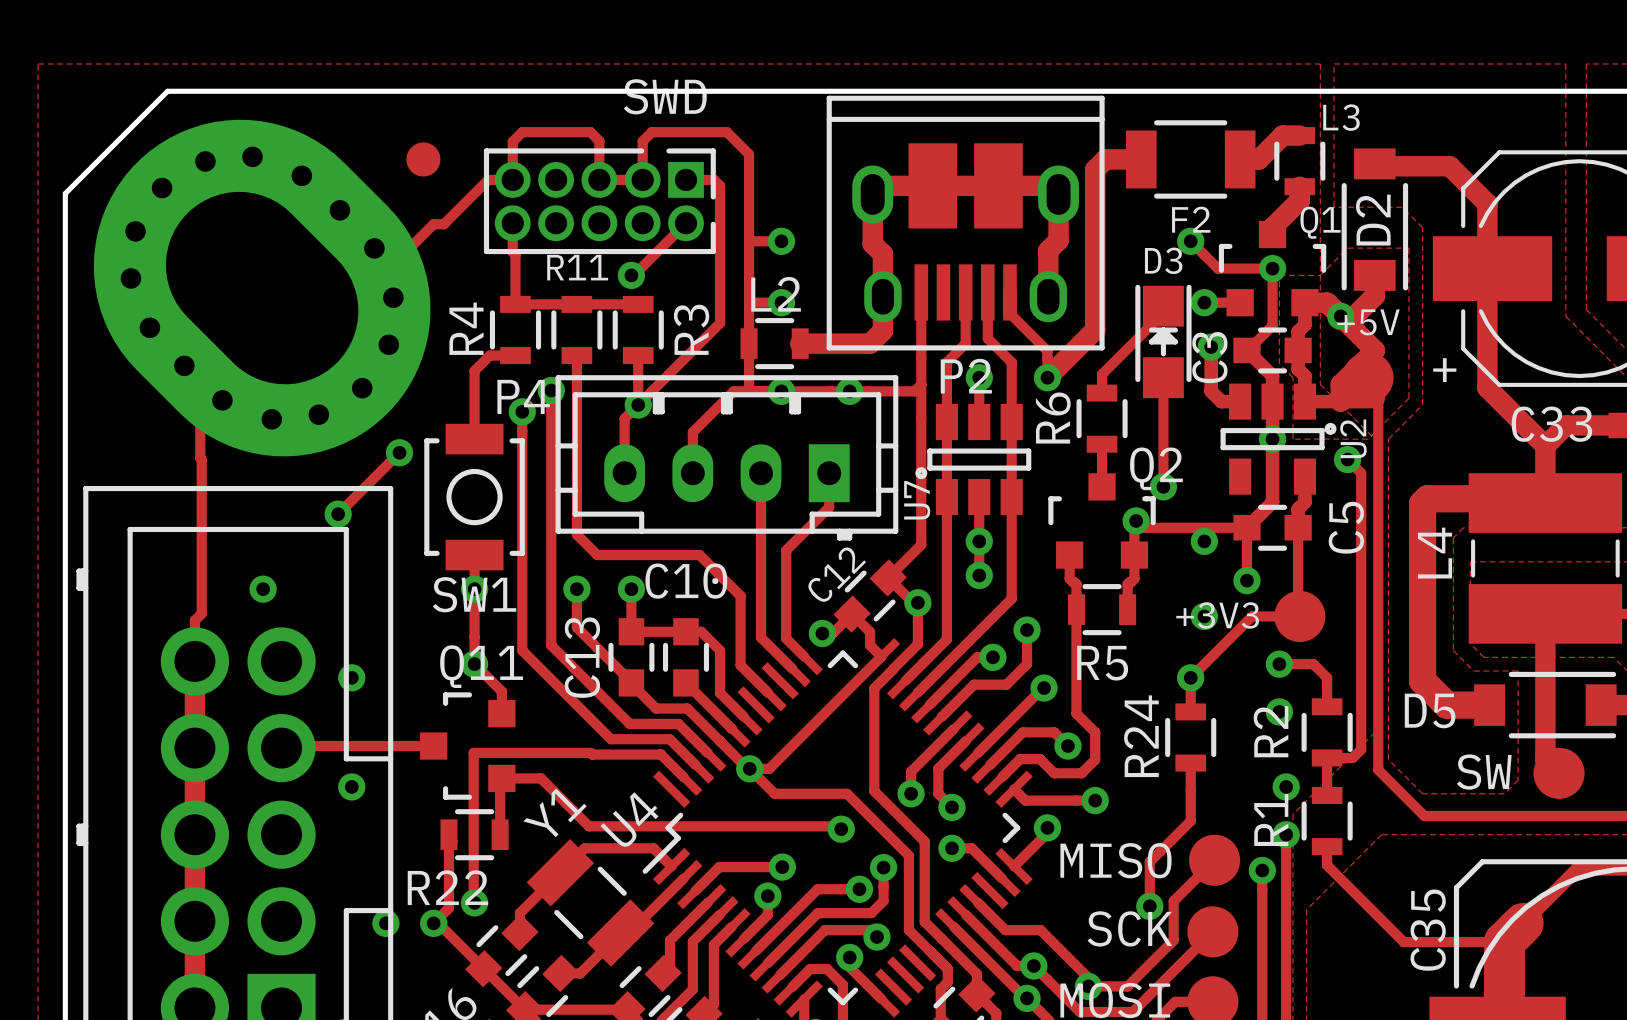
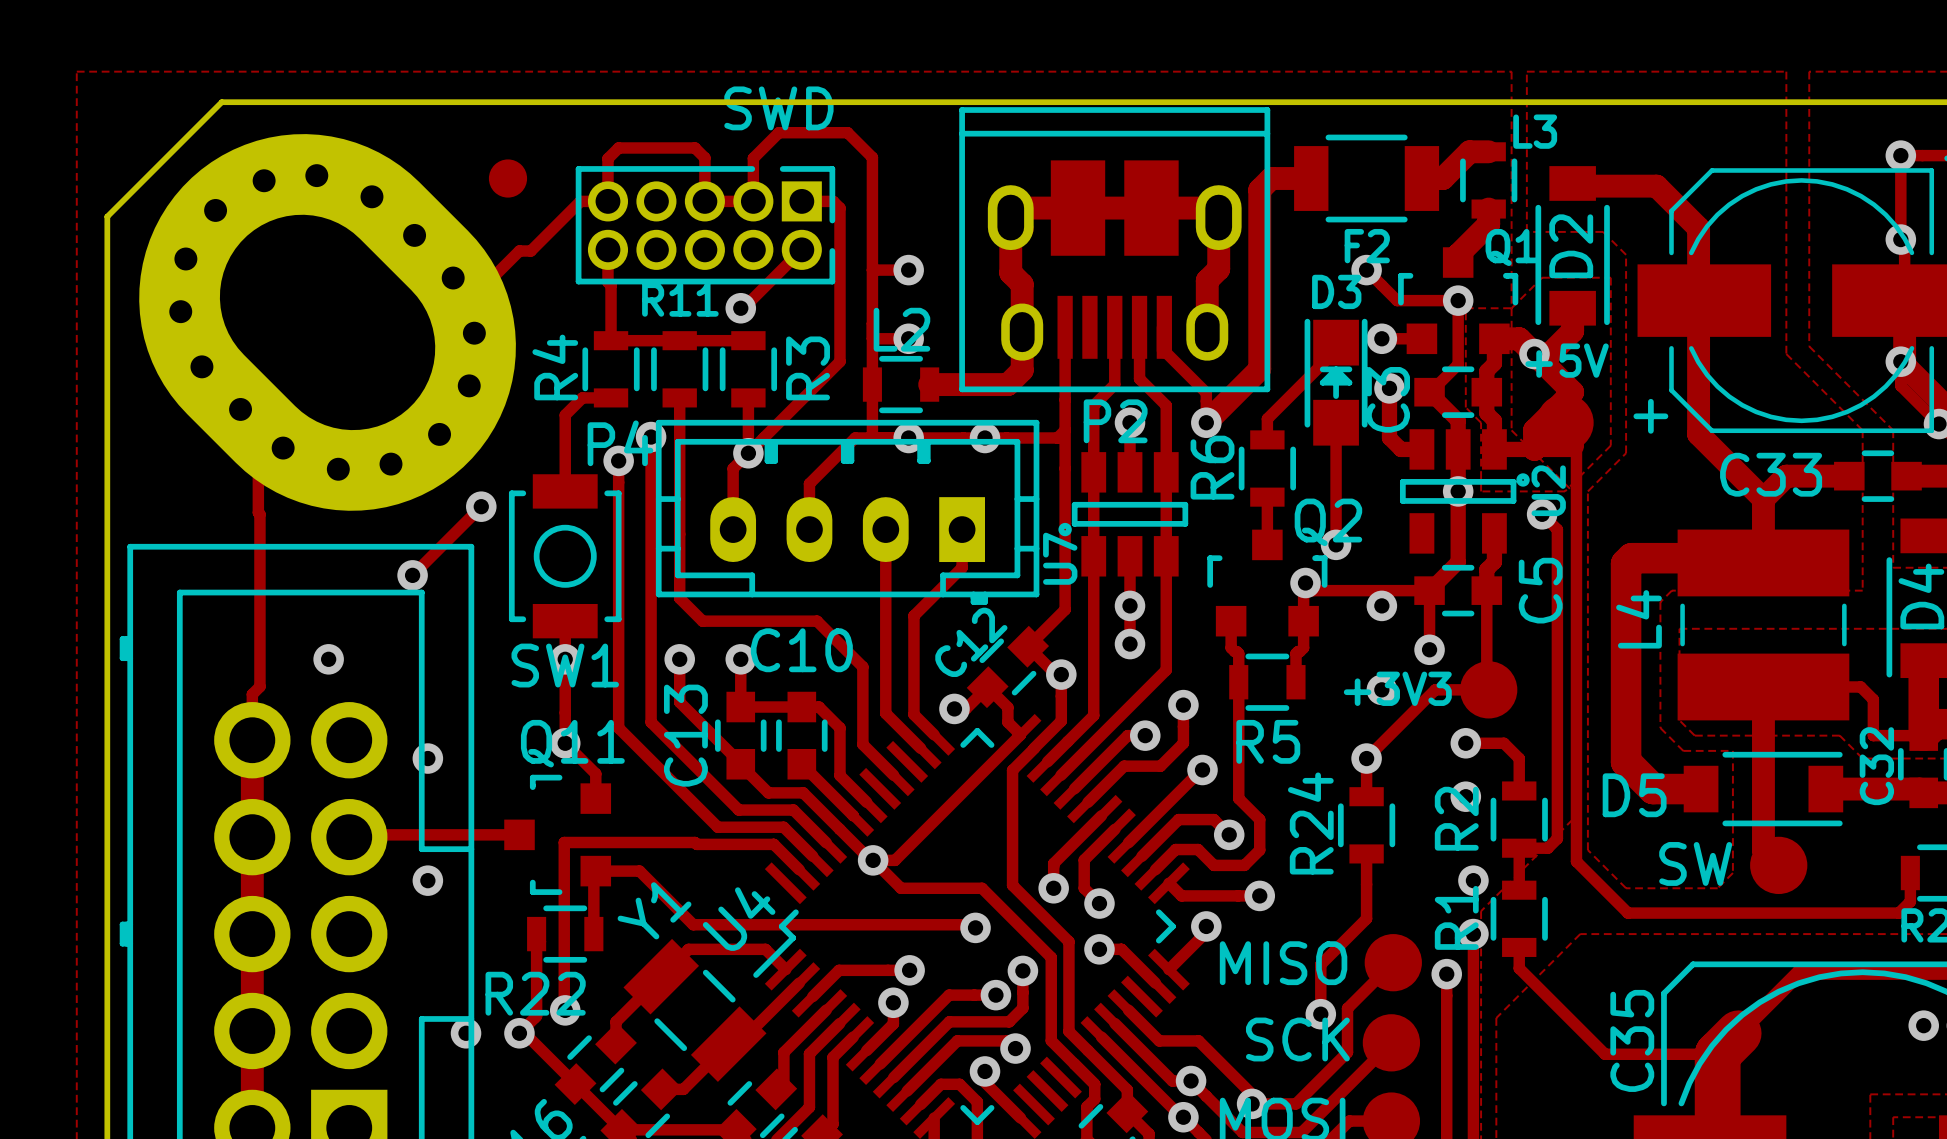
track: (651, 132) (726, 132) (749, 154) -> (763, 147) (778, 132) (847, 132) (872, 157) (872, 172)

